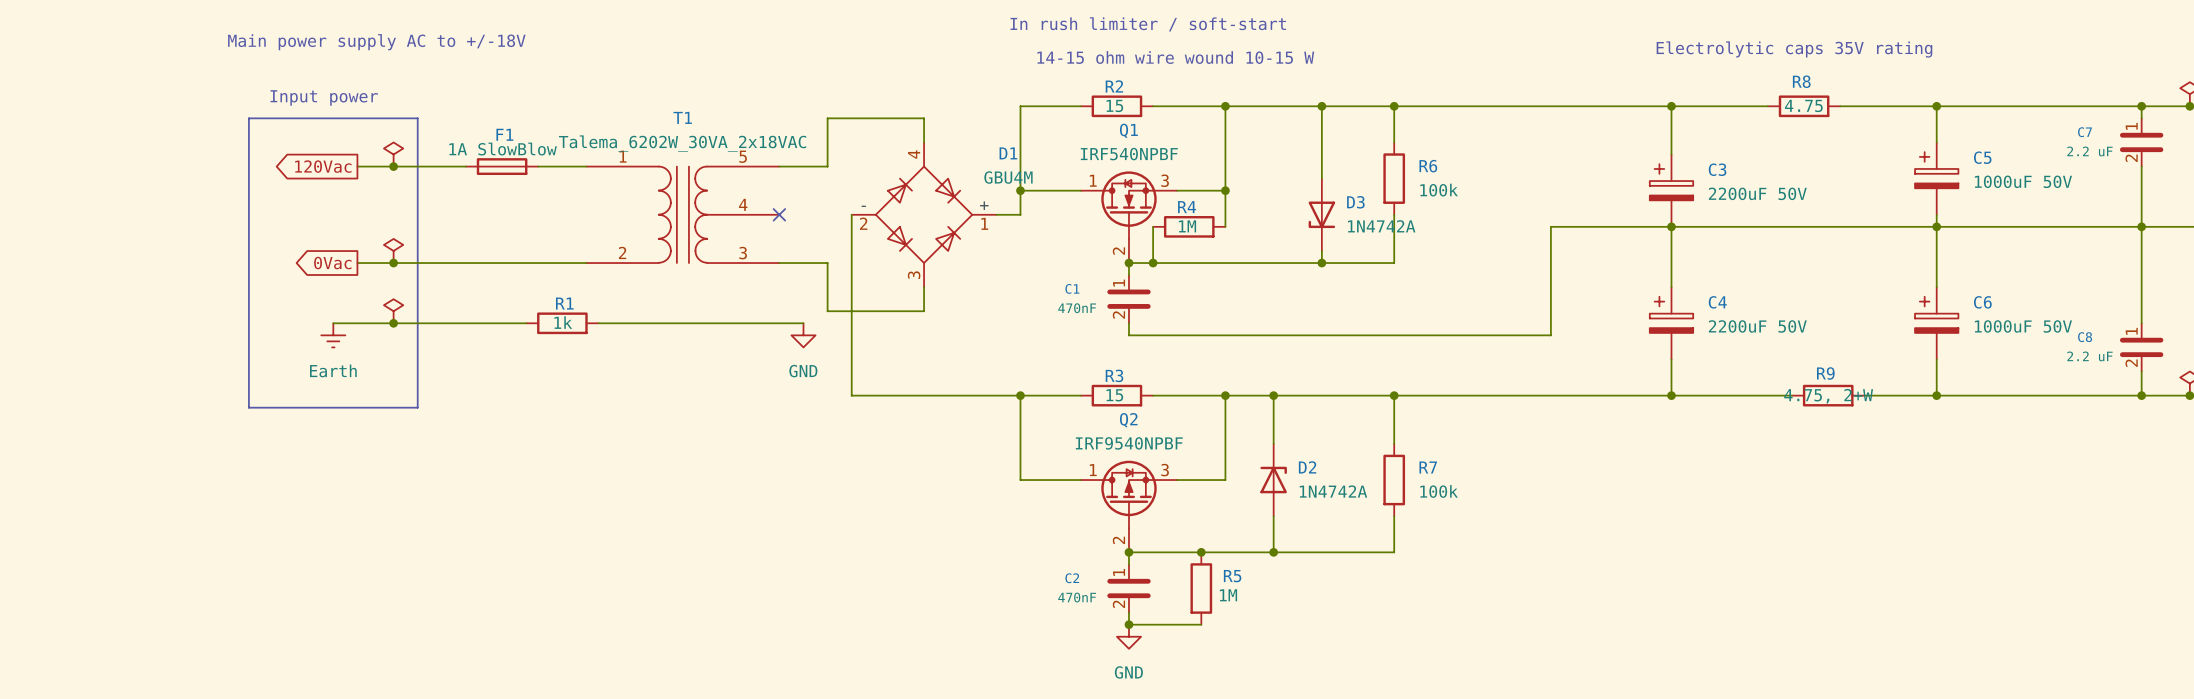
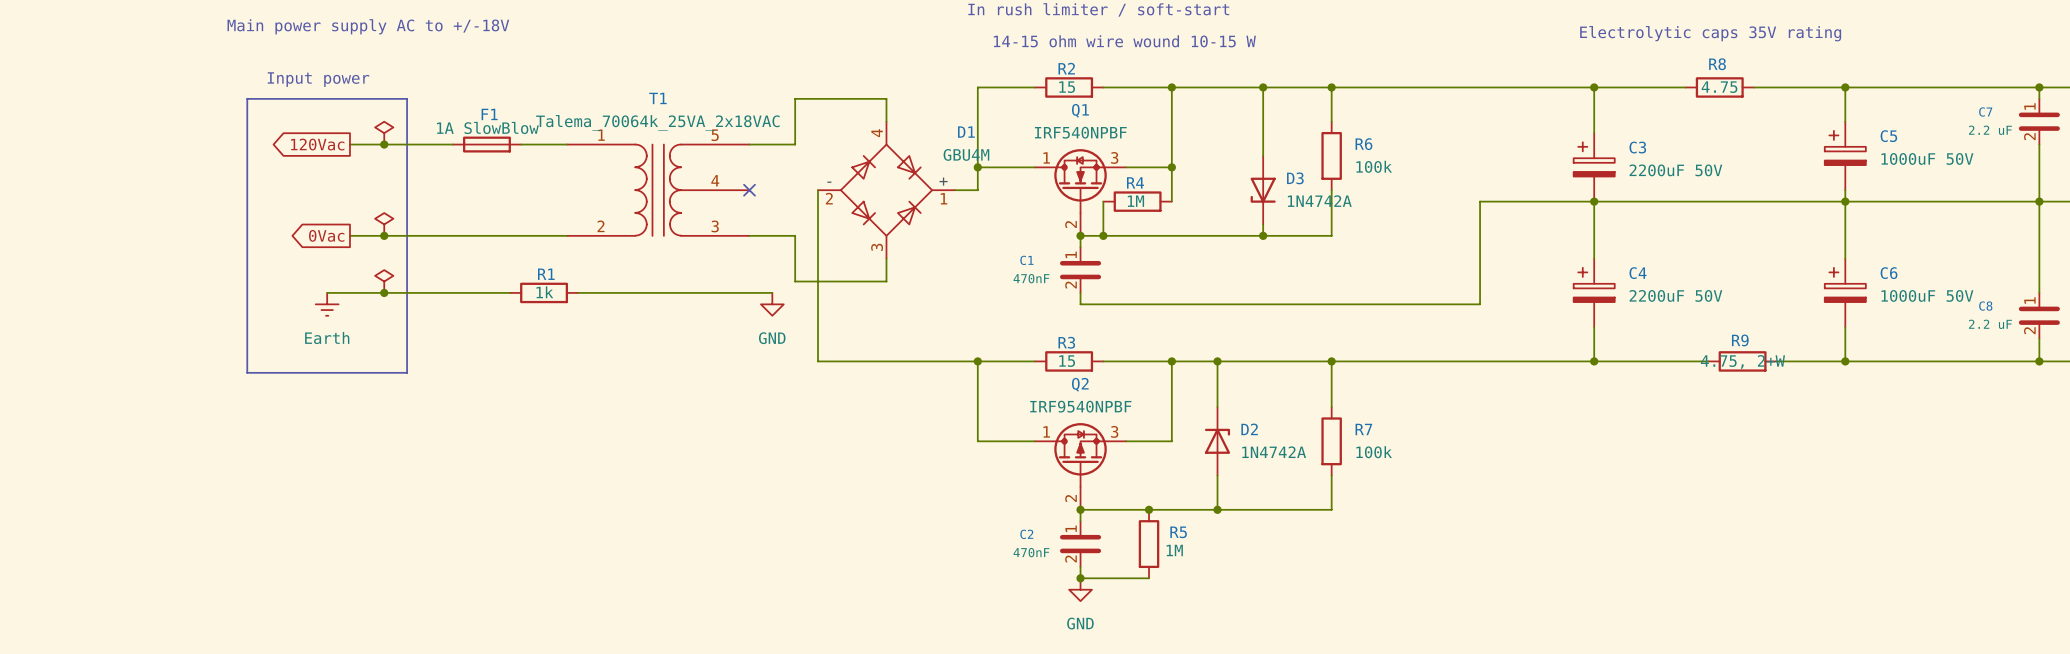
T1 value: Talema_6202W_30VA_2x18VAC (682, 143) -> Talema_70064k_25VA_2x18VAC (657, 122)

